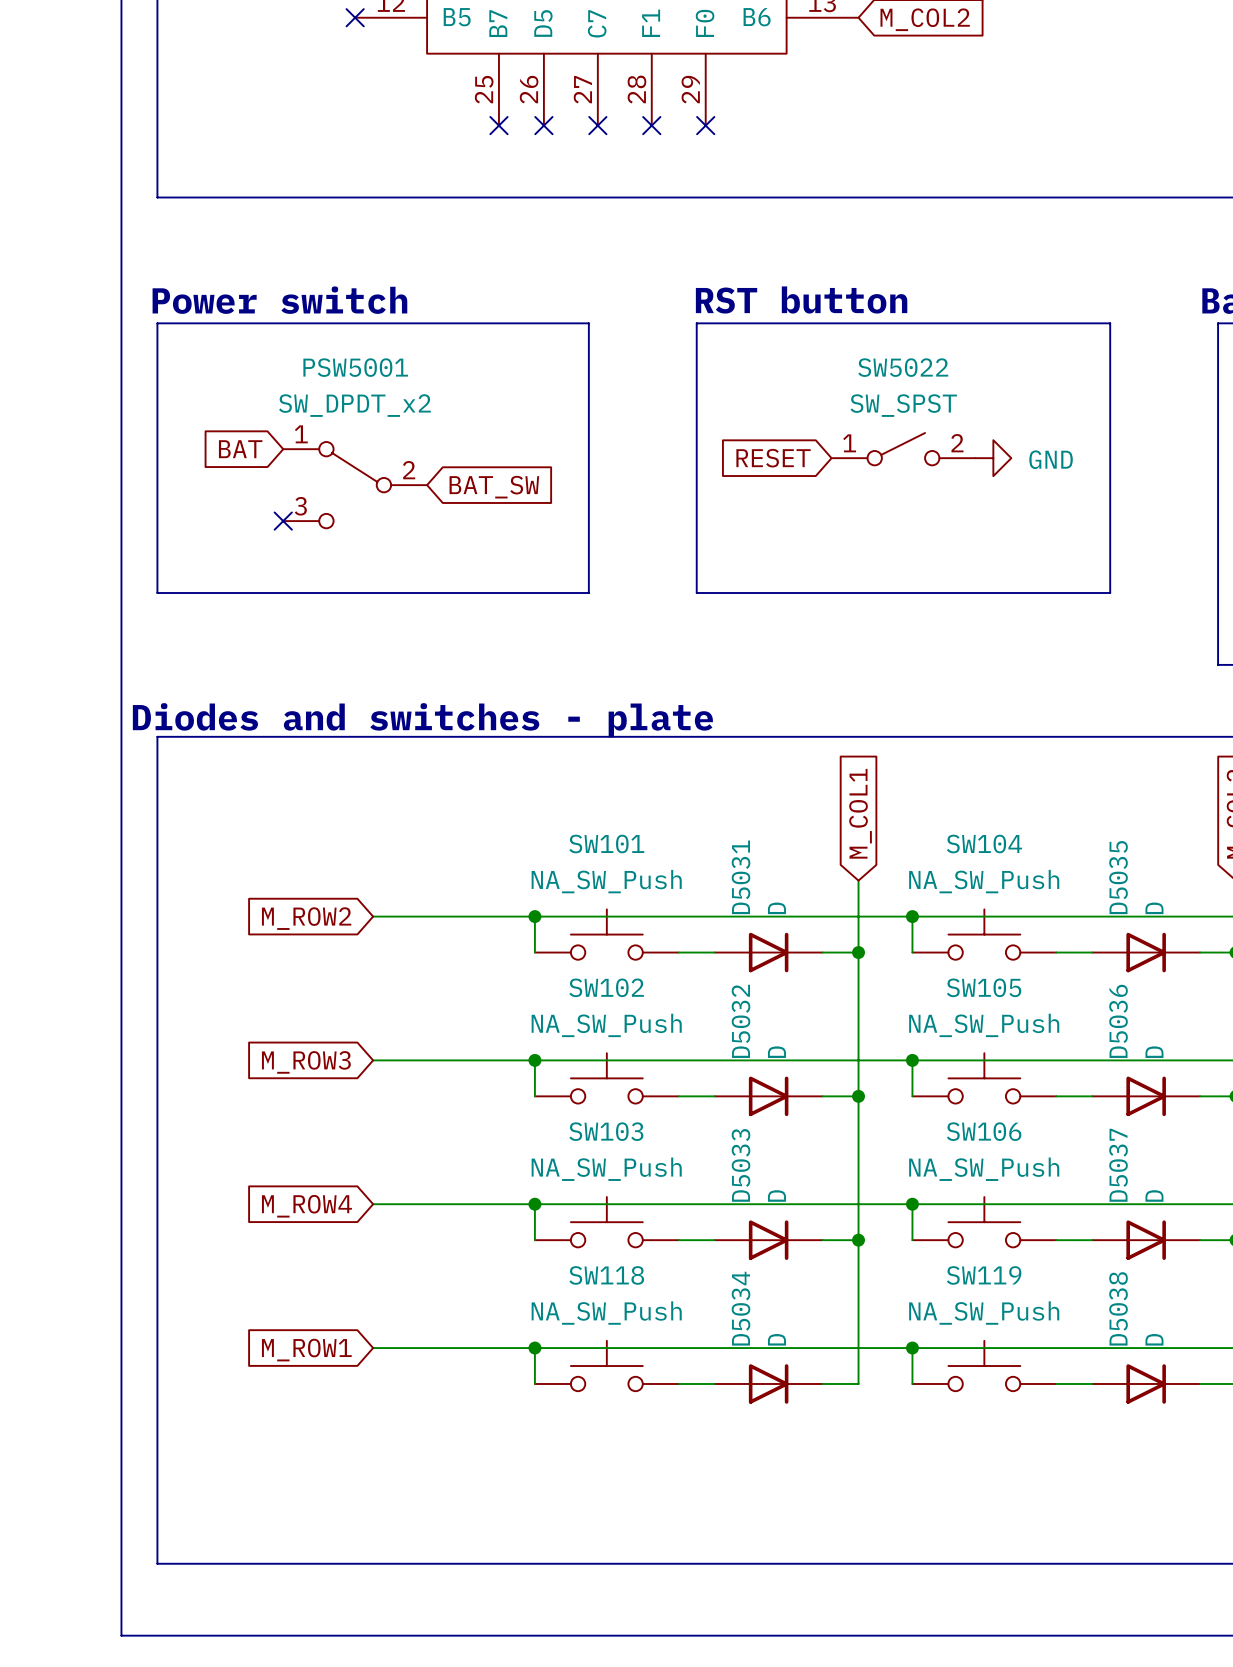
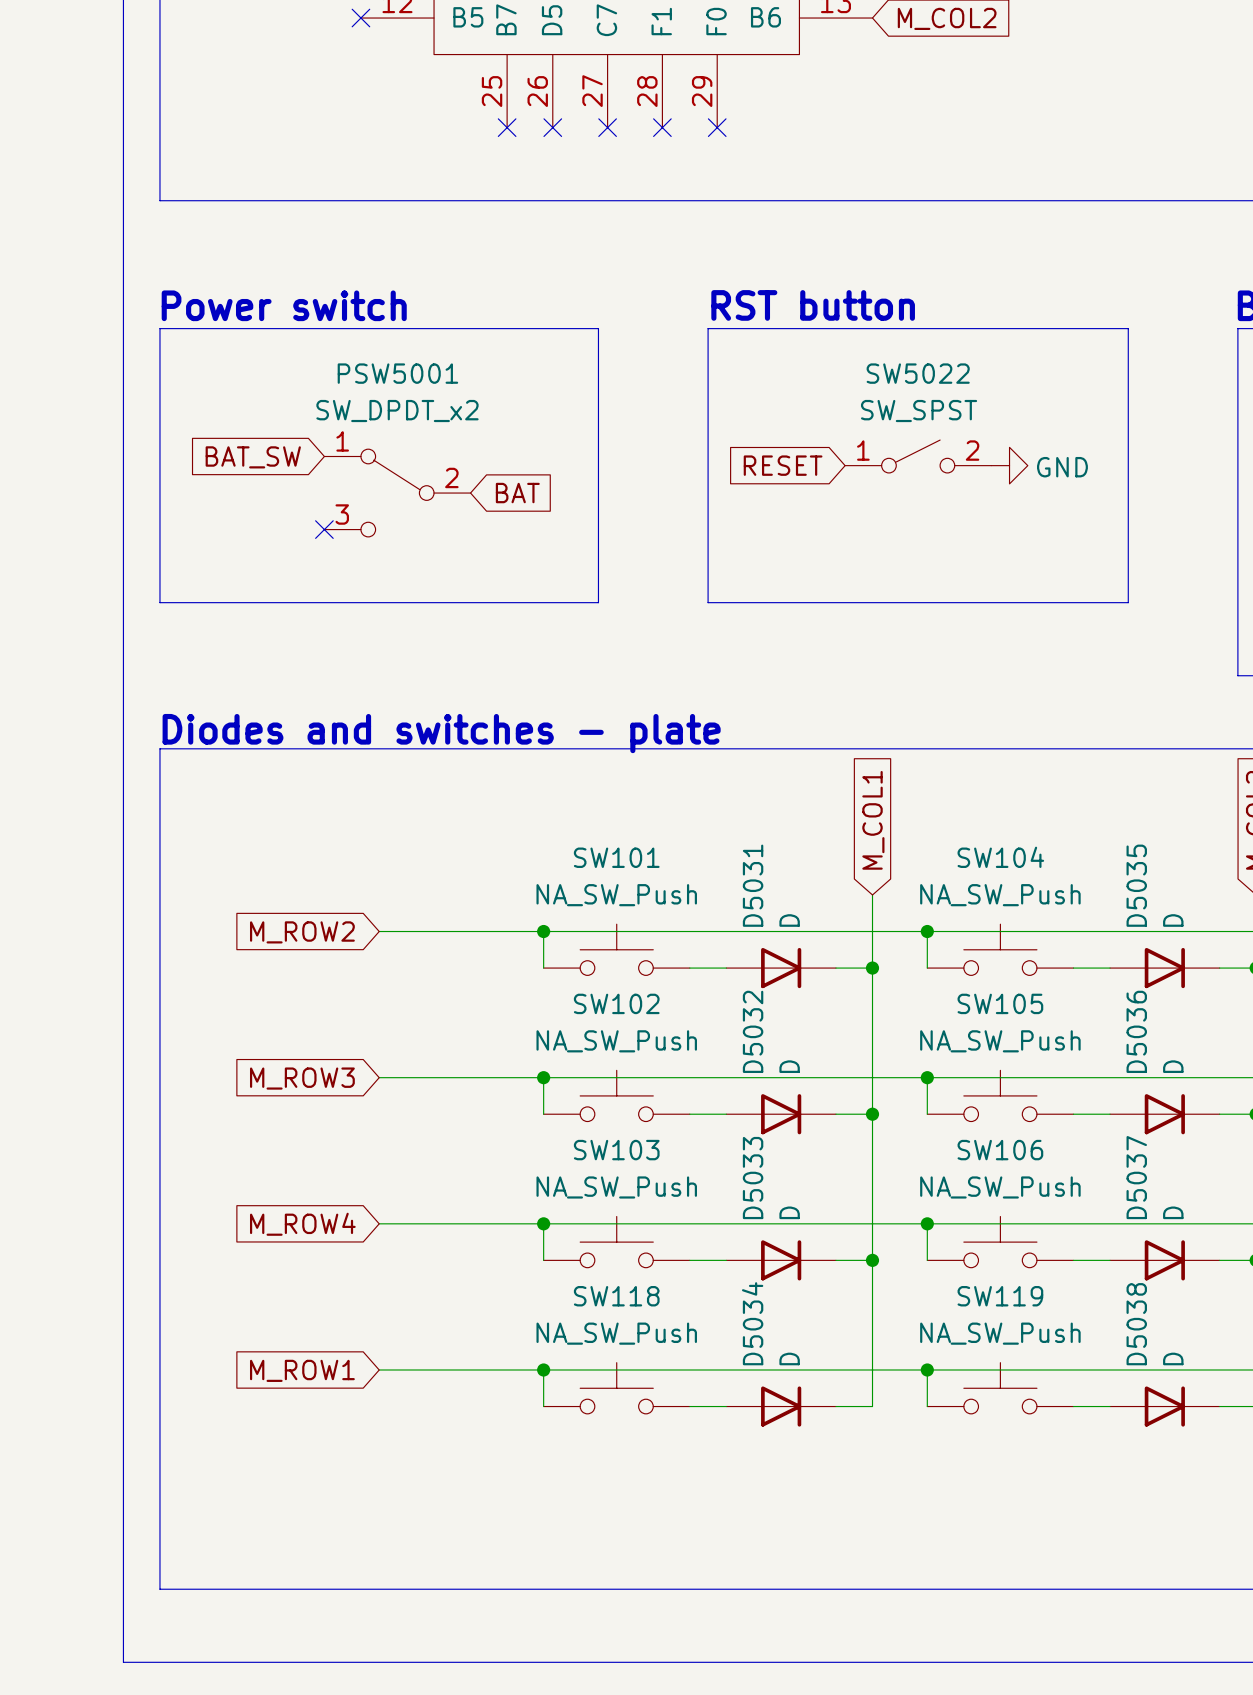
global label rotation: 0° (240, 449) -> 180° (517, 493)
global label position: BAT (240, 449) -> BAT (517, 493)
PSW5001 position: (355, 485) -> (397, 493)
global label rotation: 0° (494, 487) -> 180° (253, 457)
global label position: BAT_SW (494, 487) -> BAT_SW (253, 457)
no-connect mark position: (283, 521) -> (324, 529)

